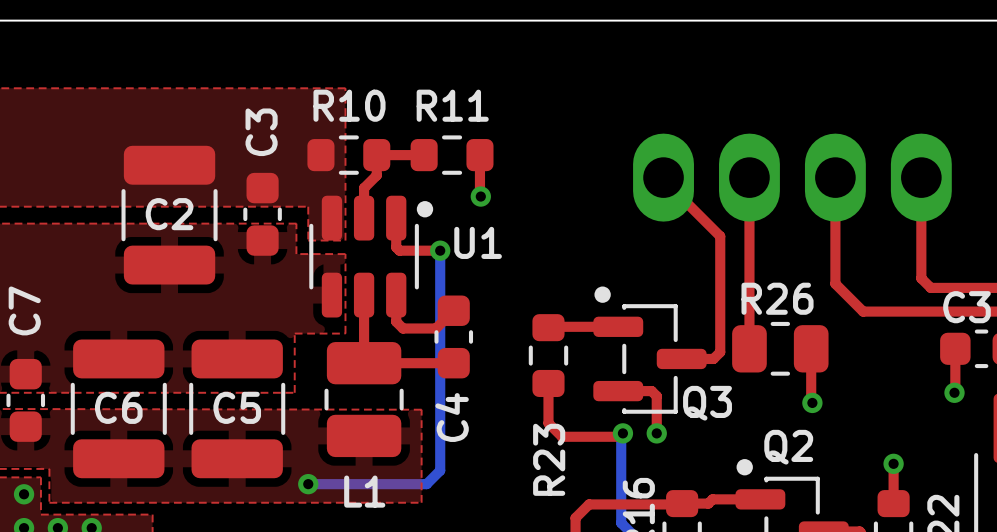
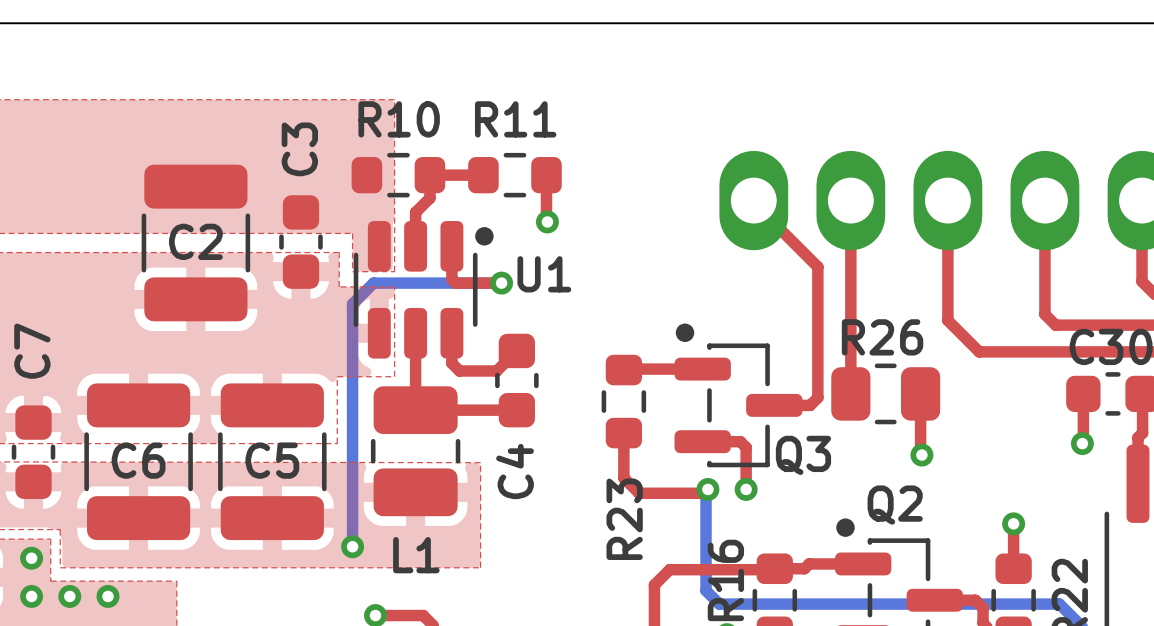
bottom track: (440, 250) (440, 470) (426, 484) (308, 484) -> (501, 283) (373, 283) (352, 304) (352, 546)

